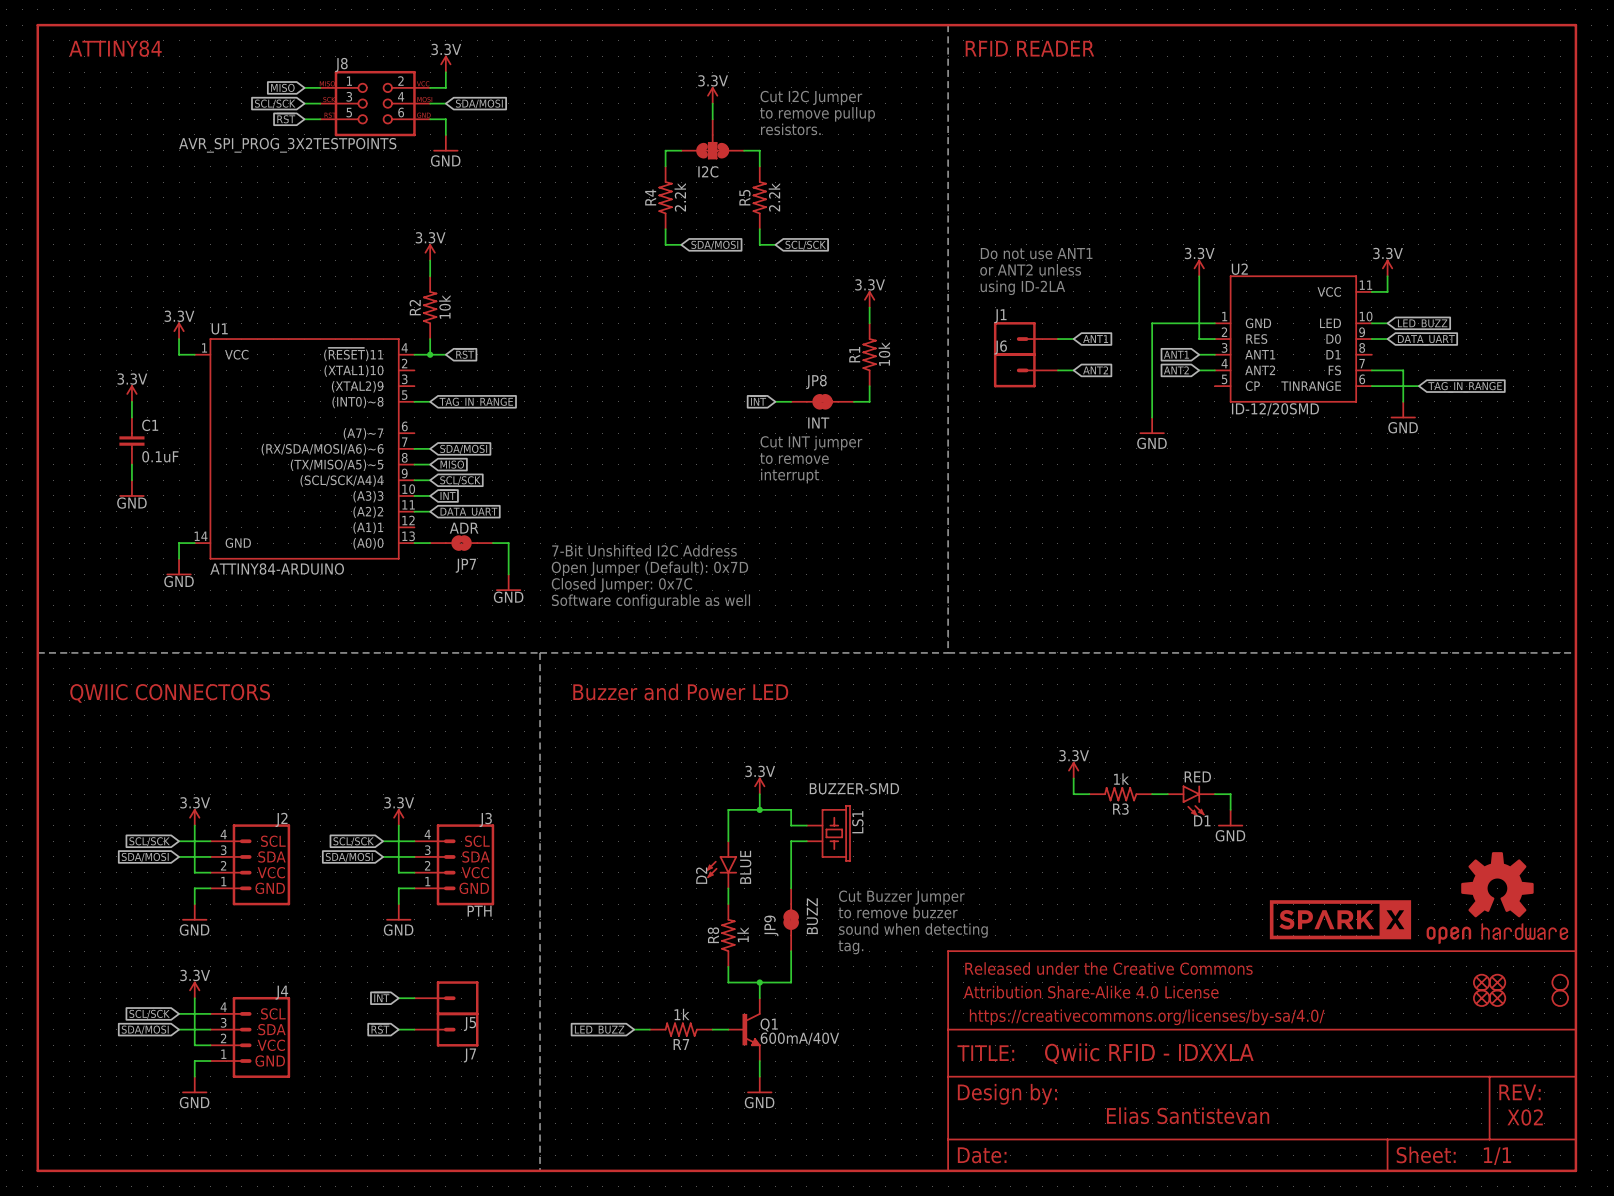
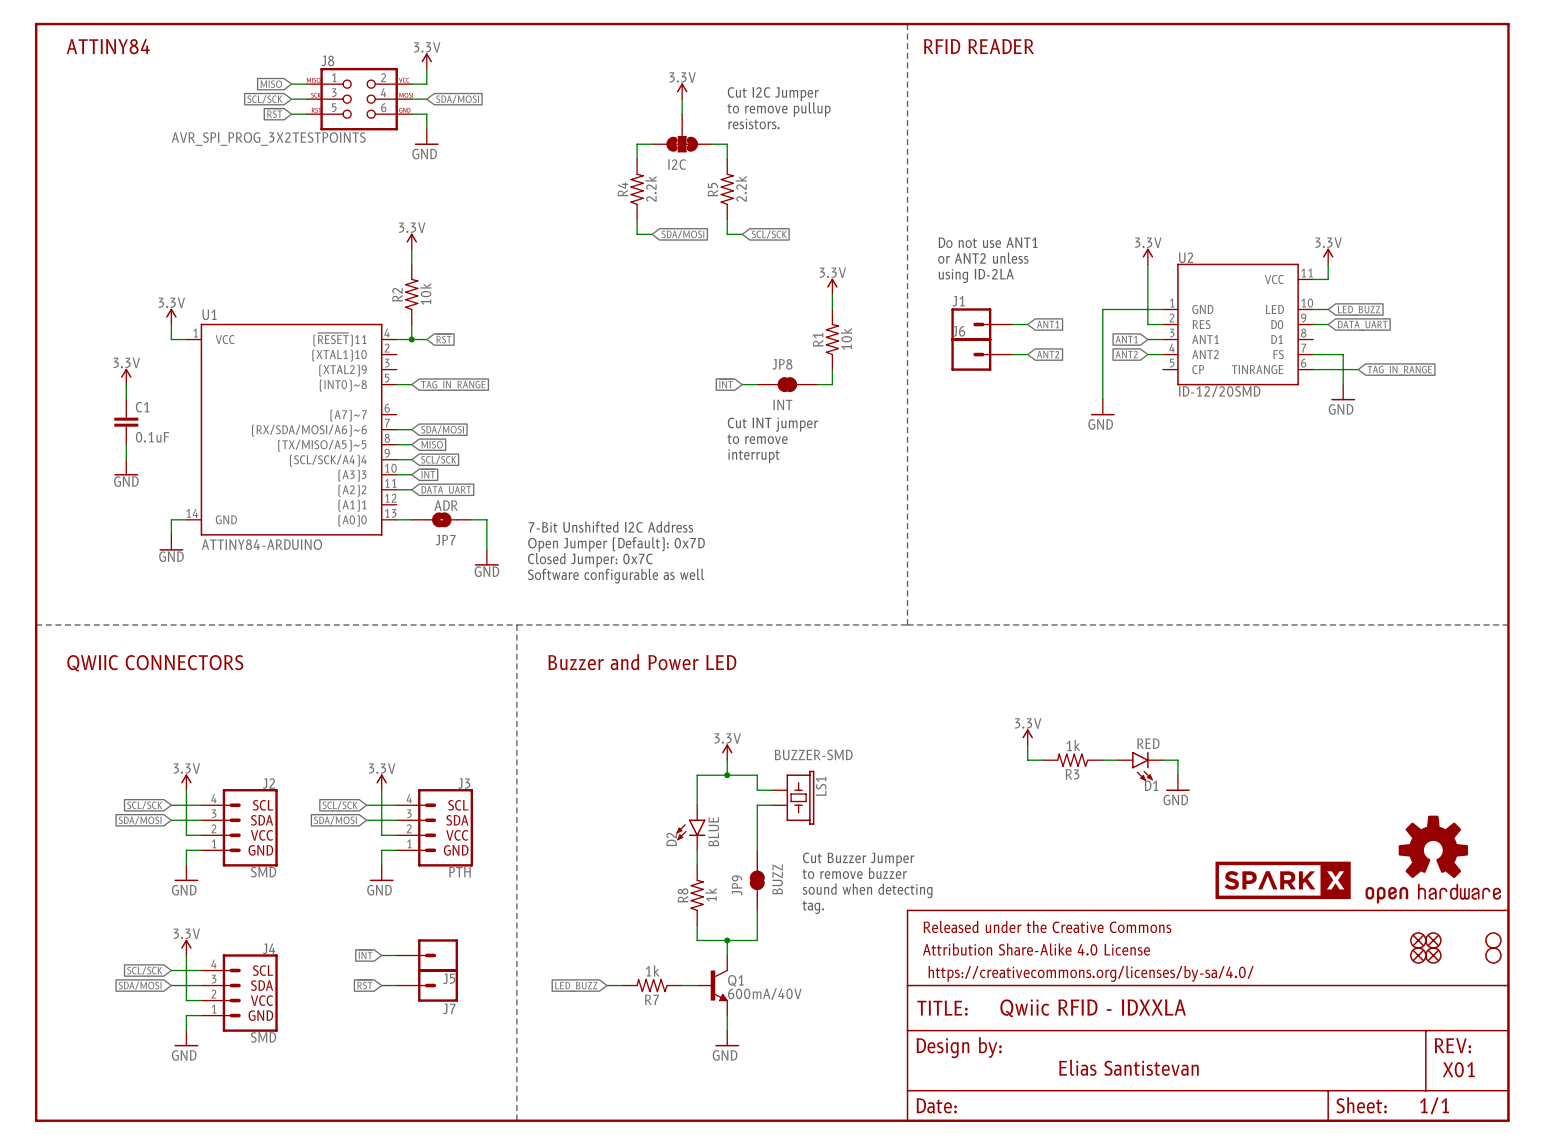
J2 value: none -> SMD (263, 872)
J4 value: none -> SMD (263, 1037)
text: X02 (1525, 1117) -> X01 (1458, 1069)

